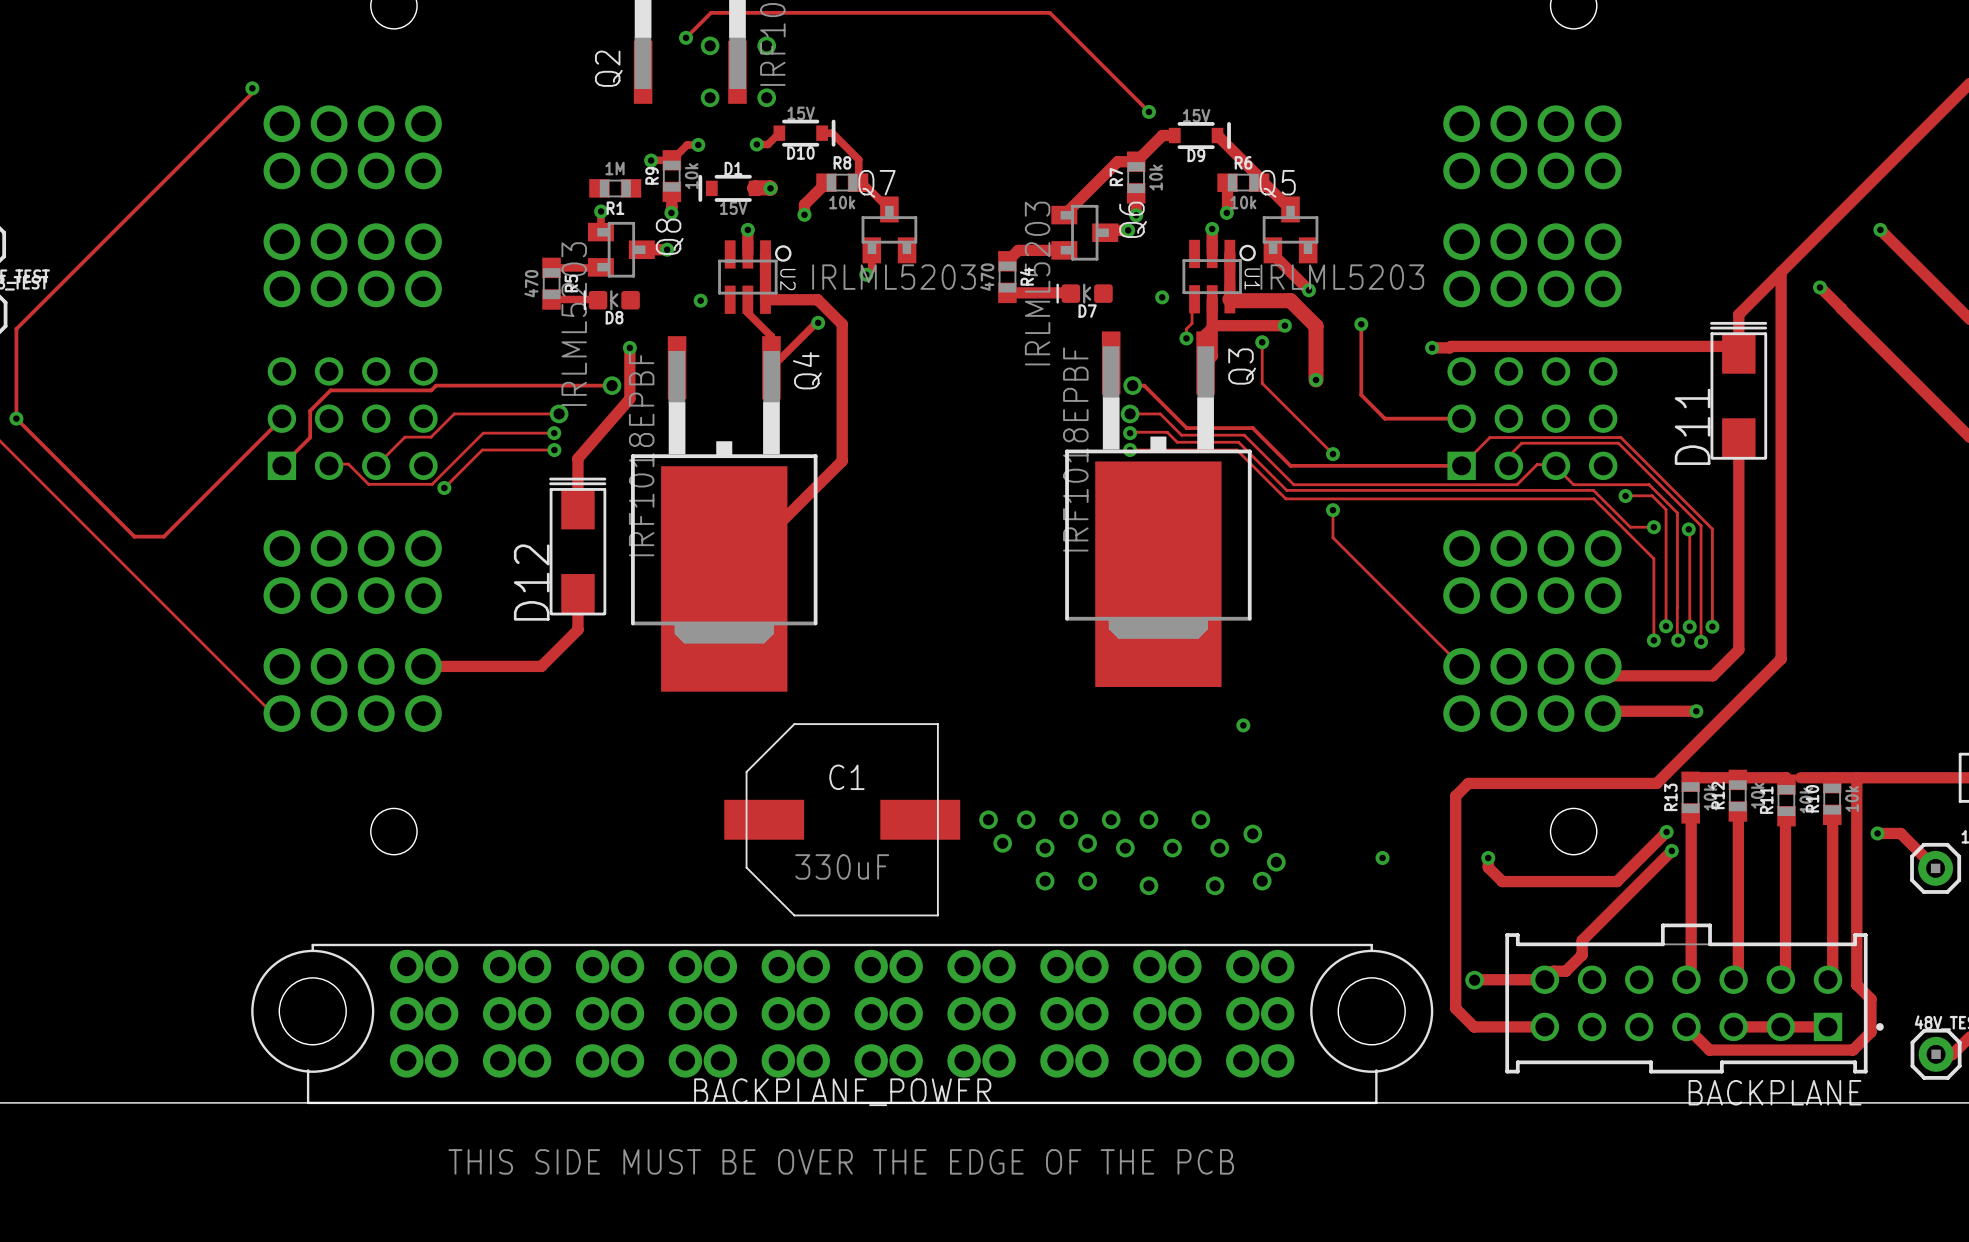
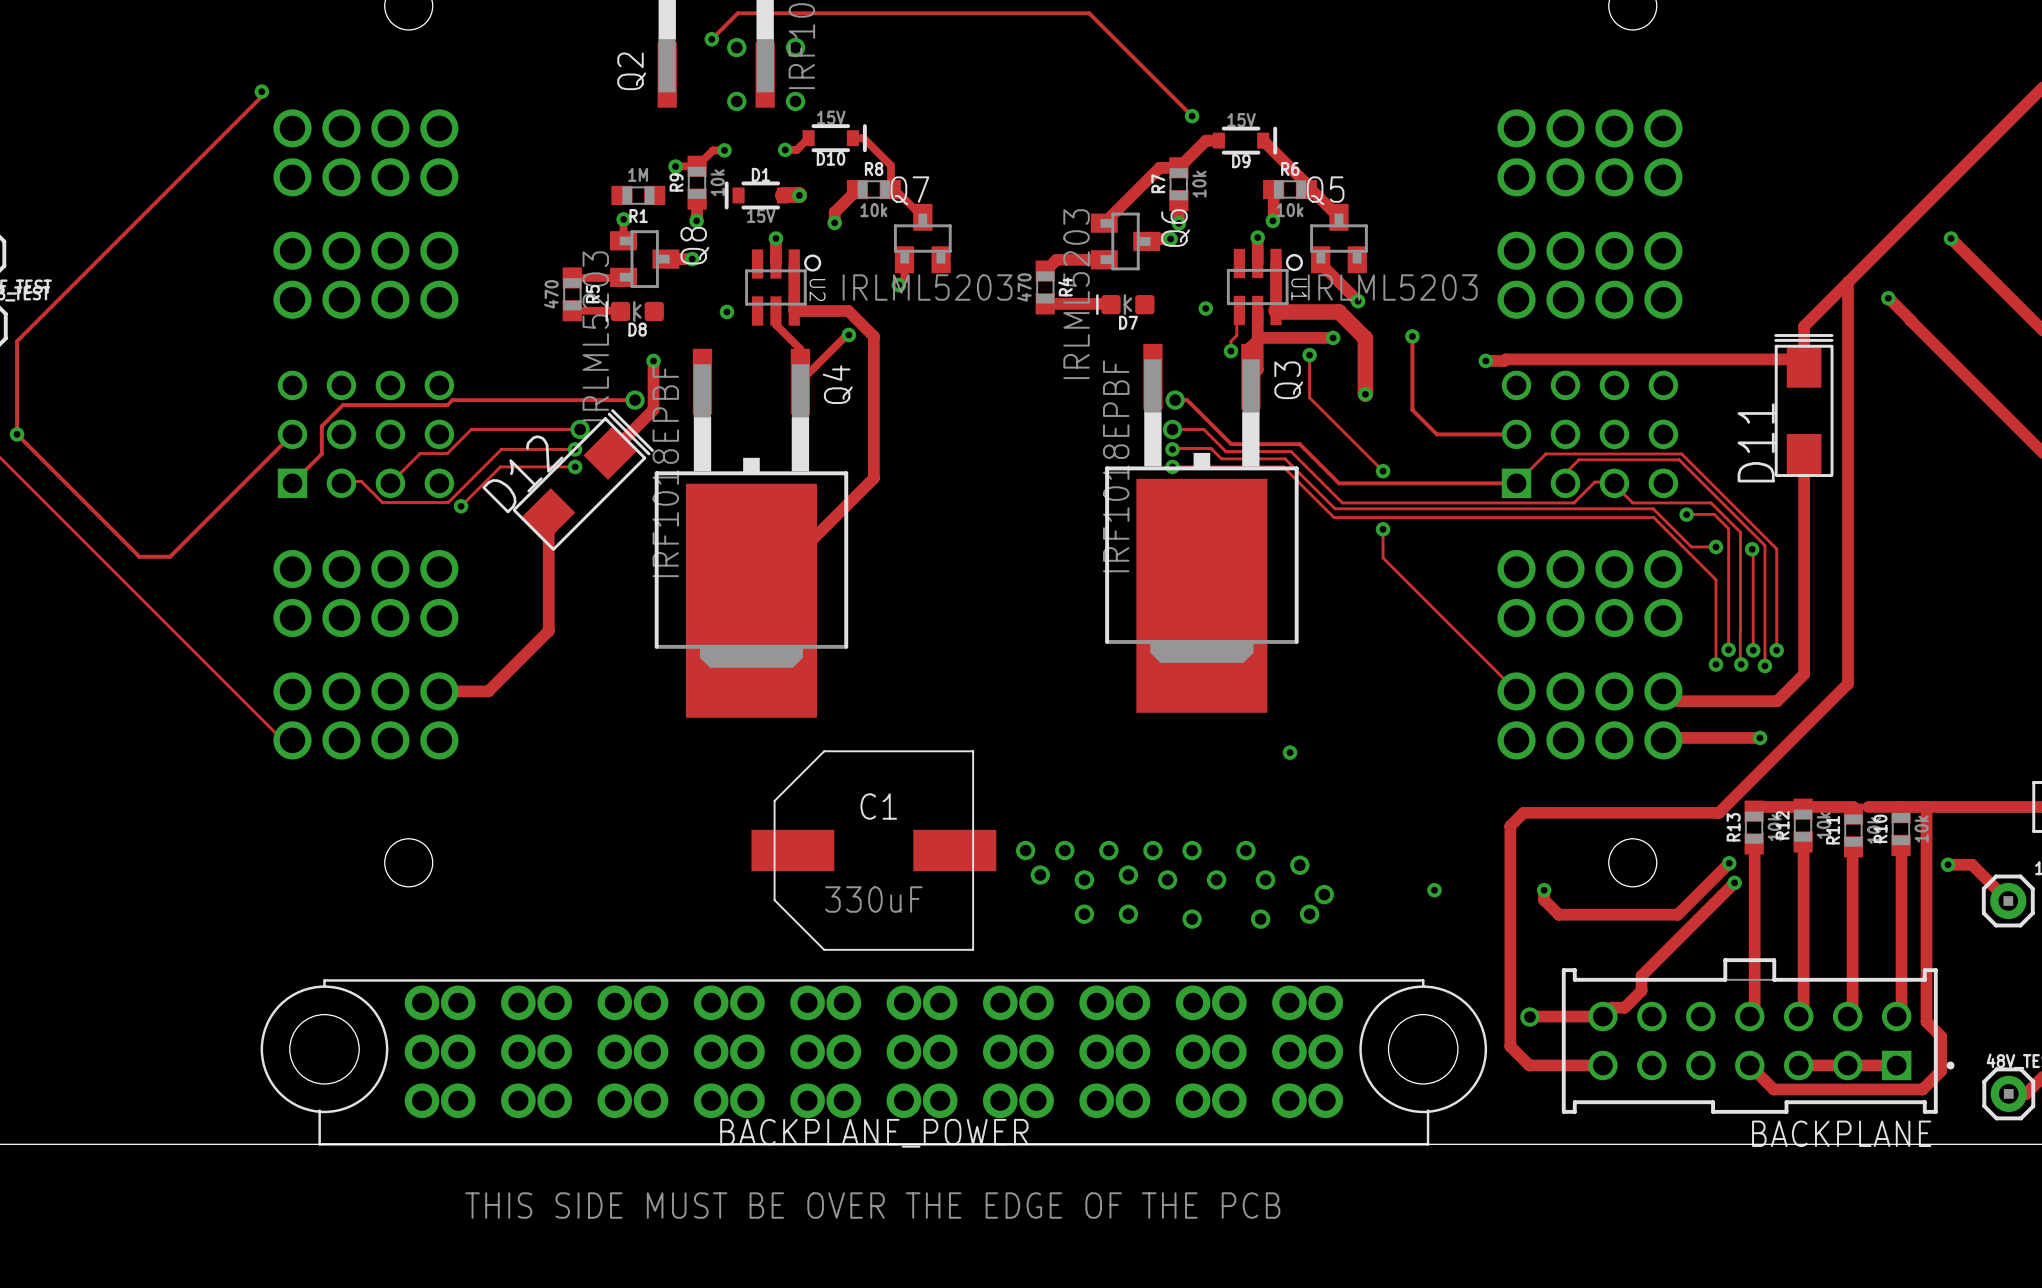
track: (629, 395) (629, 398) (577, 458) (577, 509) -> (653, 409) (610, 453)
D12 rotation: 0° (577, 546) -> 45° clockwise (583, 479)
D12 position: (577, 546) -> (583, 479)
track: (577, 593) (577, 629) (541, 666) (470, 666) -> (548, 514) (548, 631) (488, 691)

